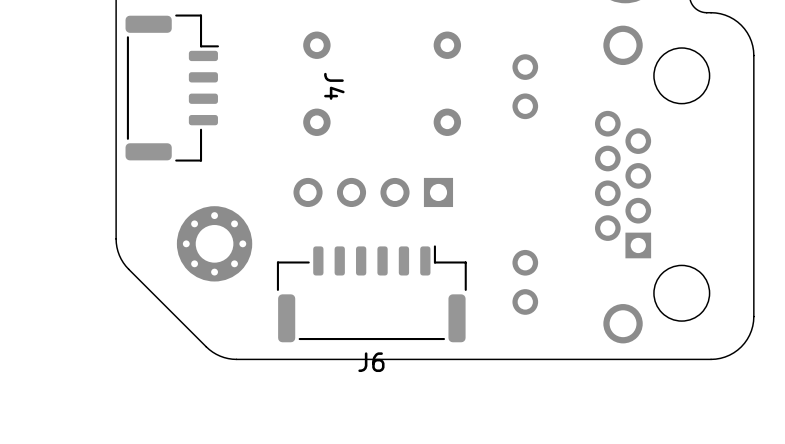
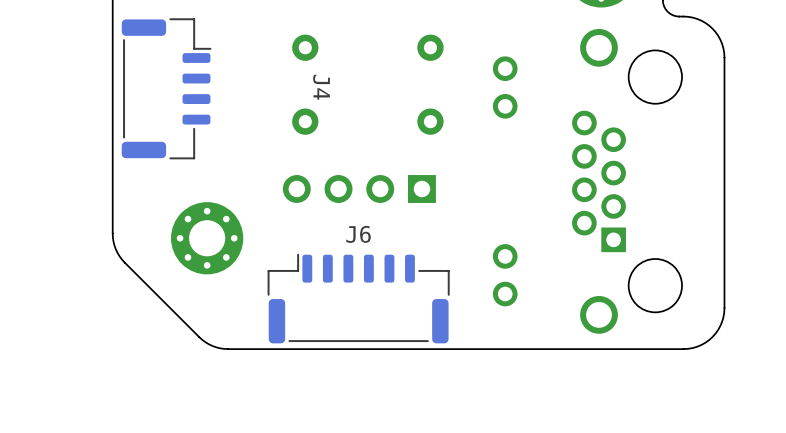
J6 footprint: [276, 245, 467, 343] -> [267, 253, 450, 344]
J6 name position: J6 (371, 362) -> J6 (358, 234)

